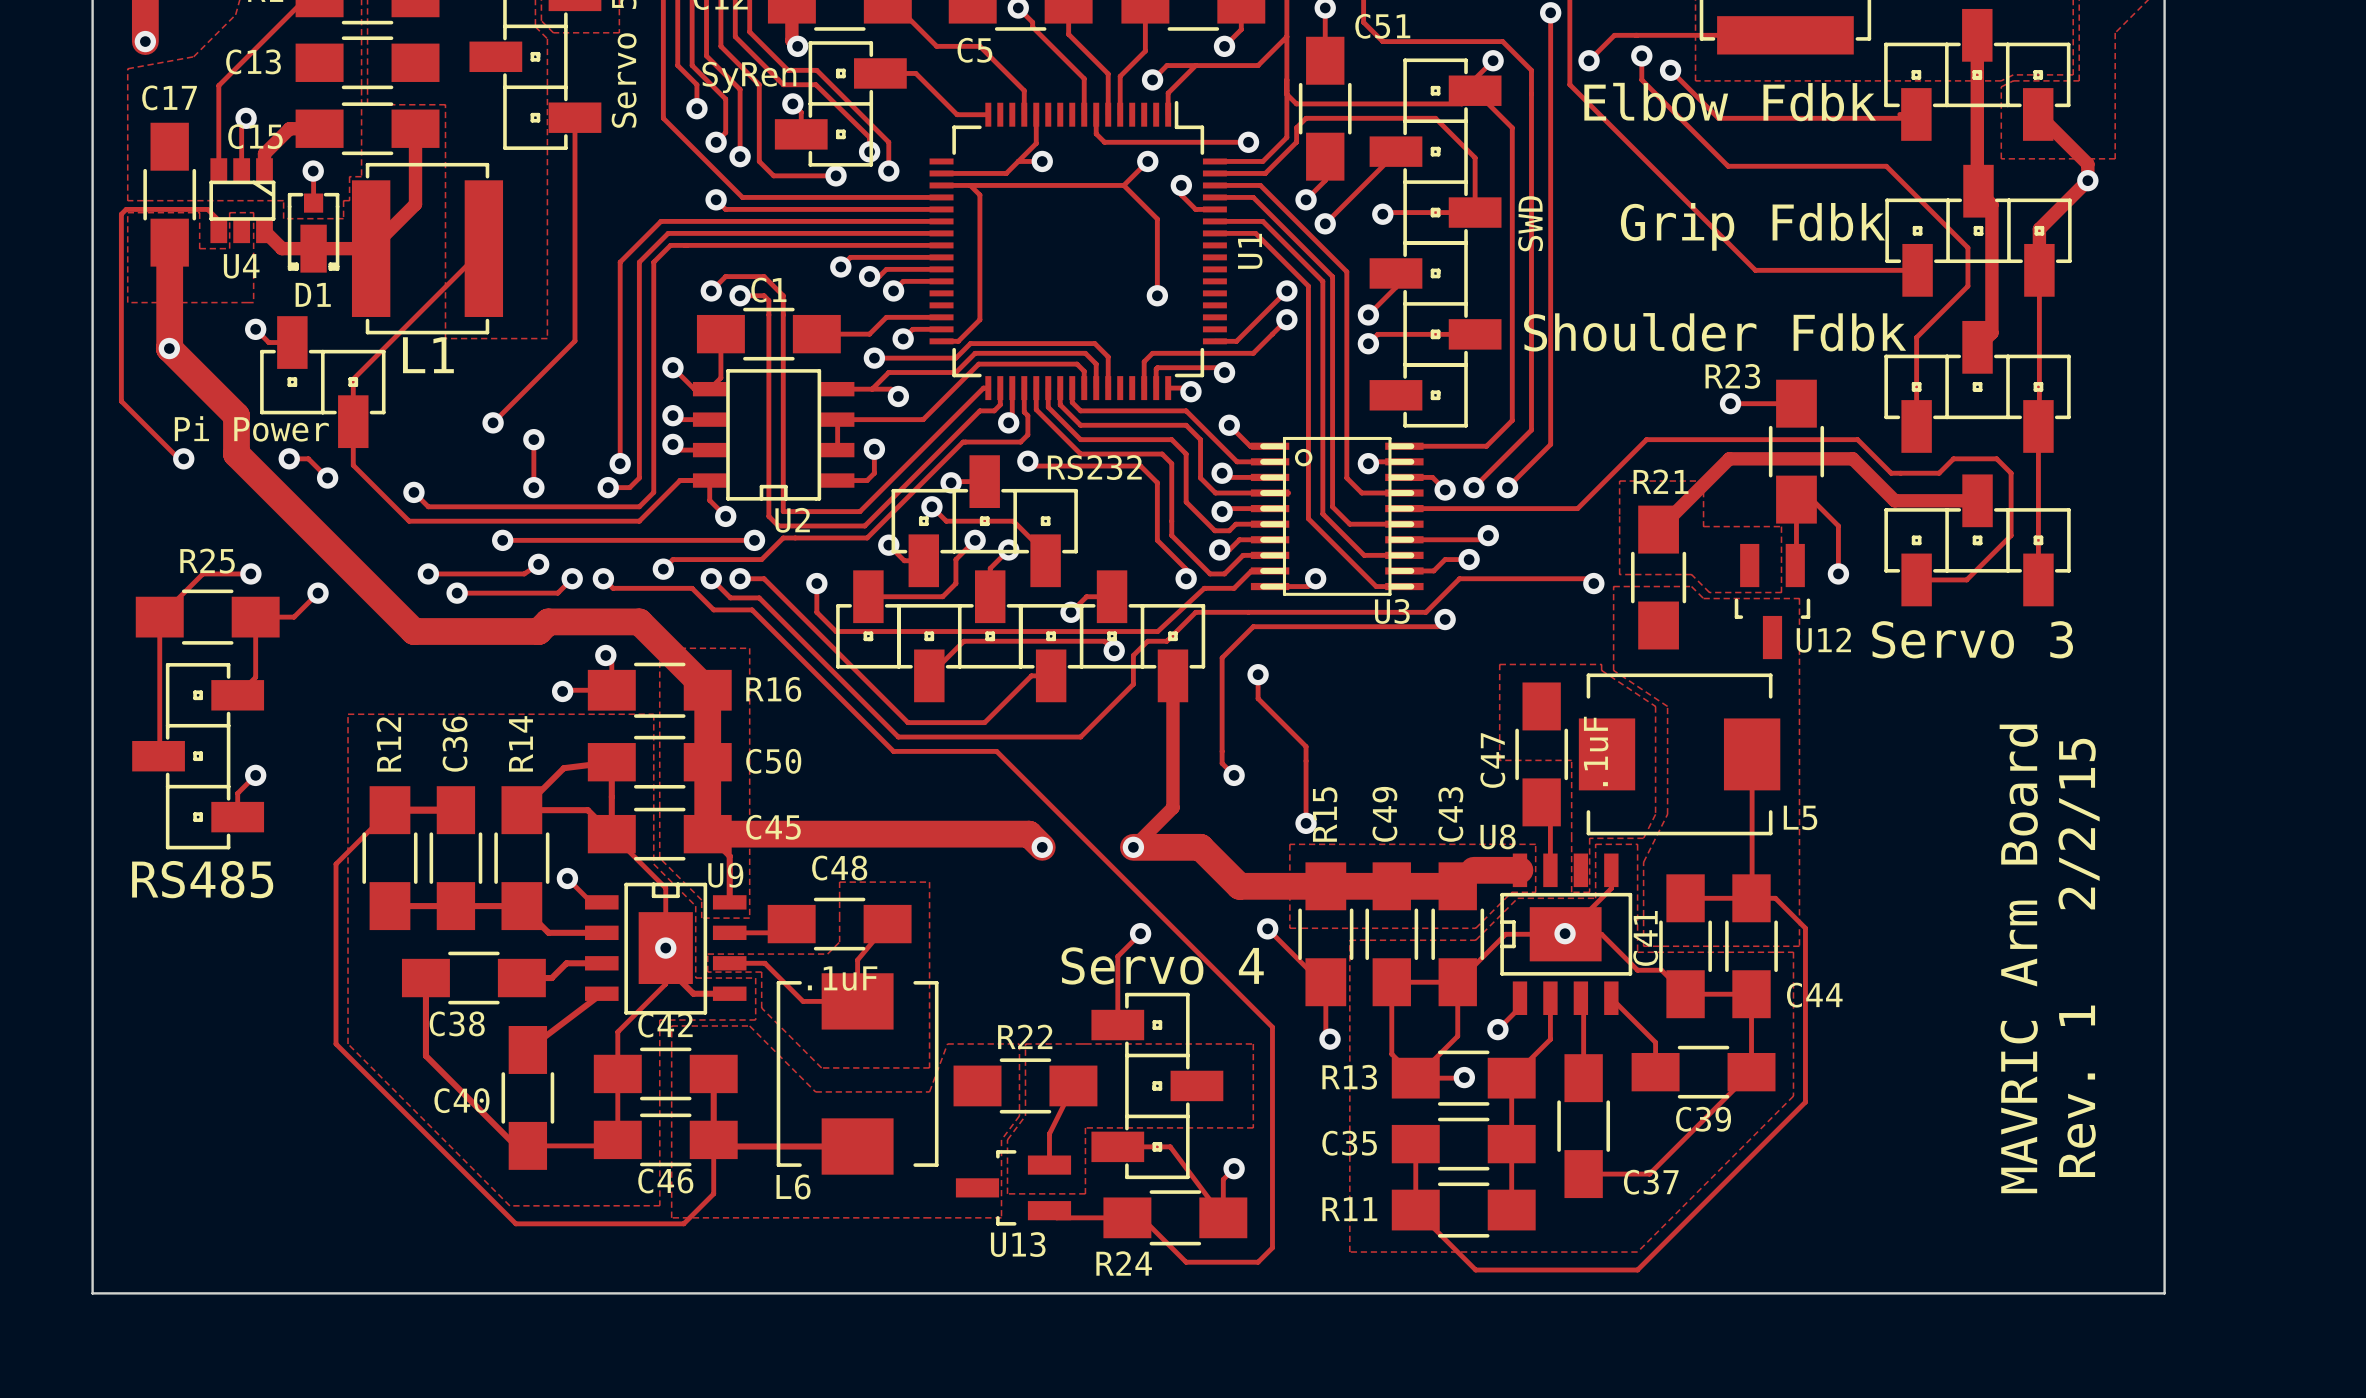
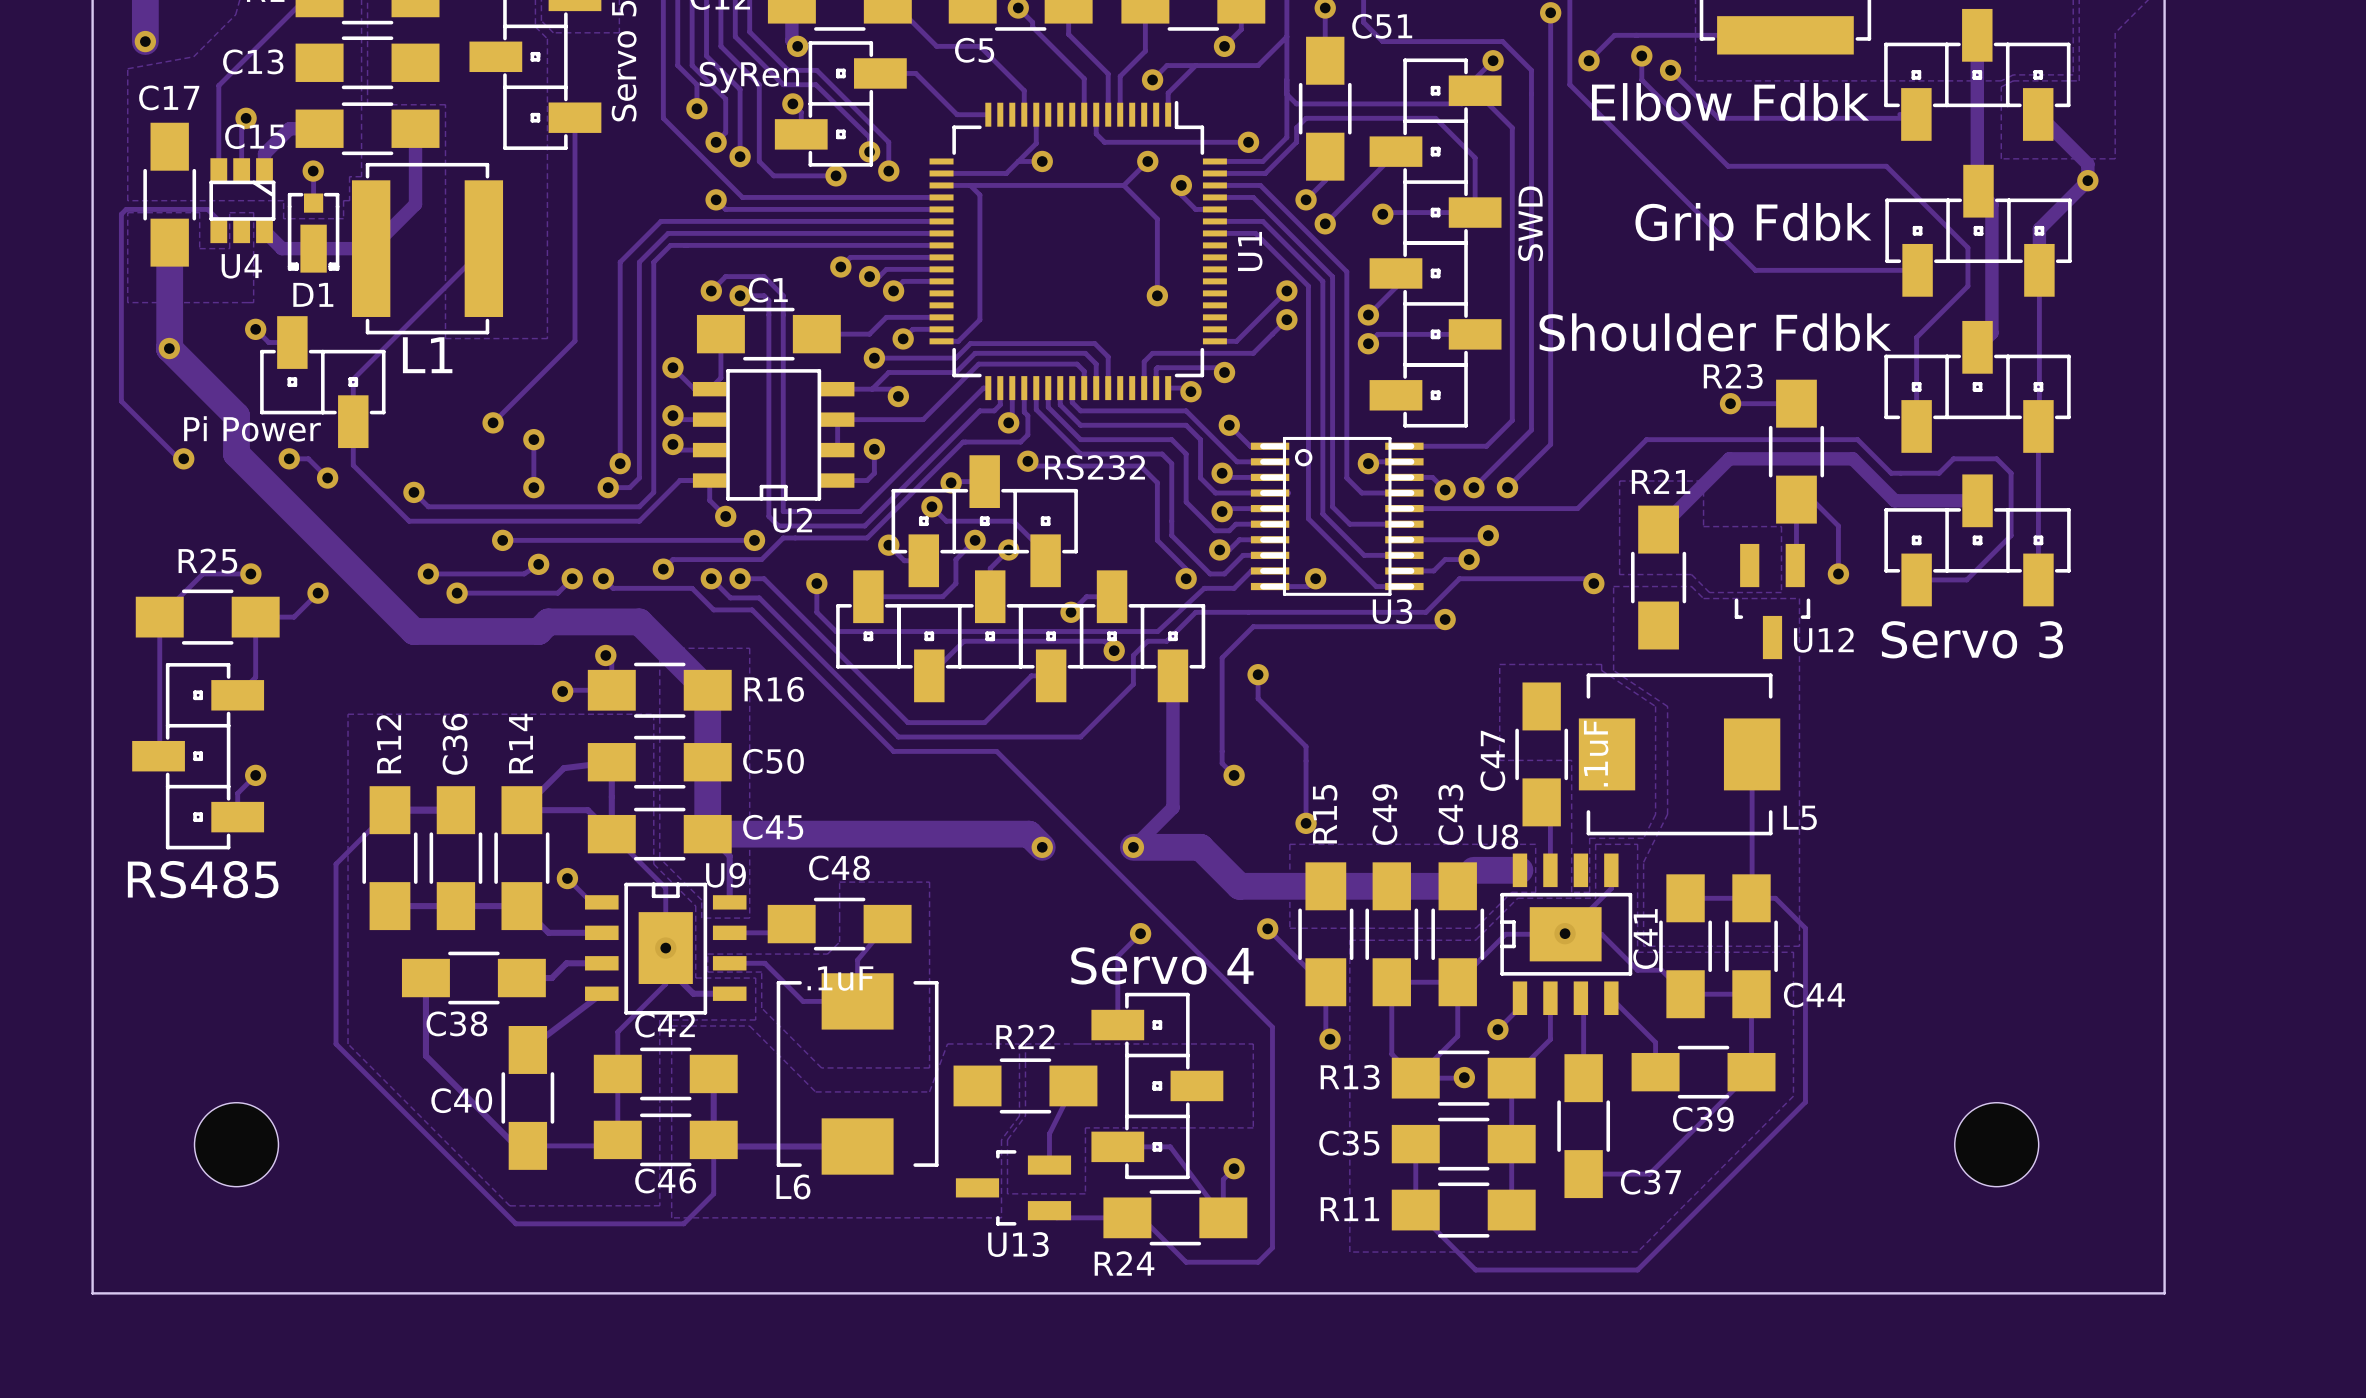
text: Rev. 1 2/2/15 (2079, 957) -> none
text: MAVRIC Arm Board (2018, 958) -> none
part: none -> (236, 1144)
part: none -> (1996, 1144)

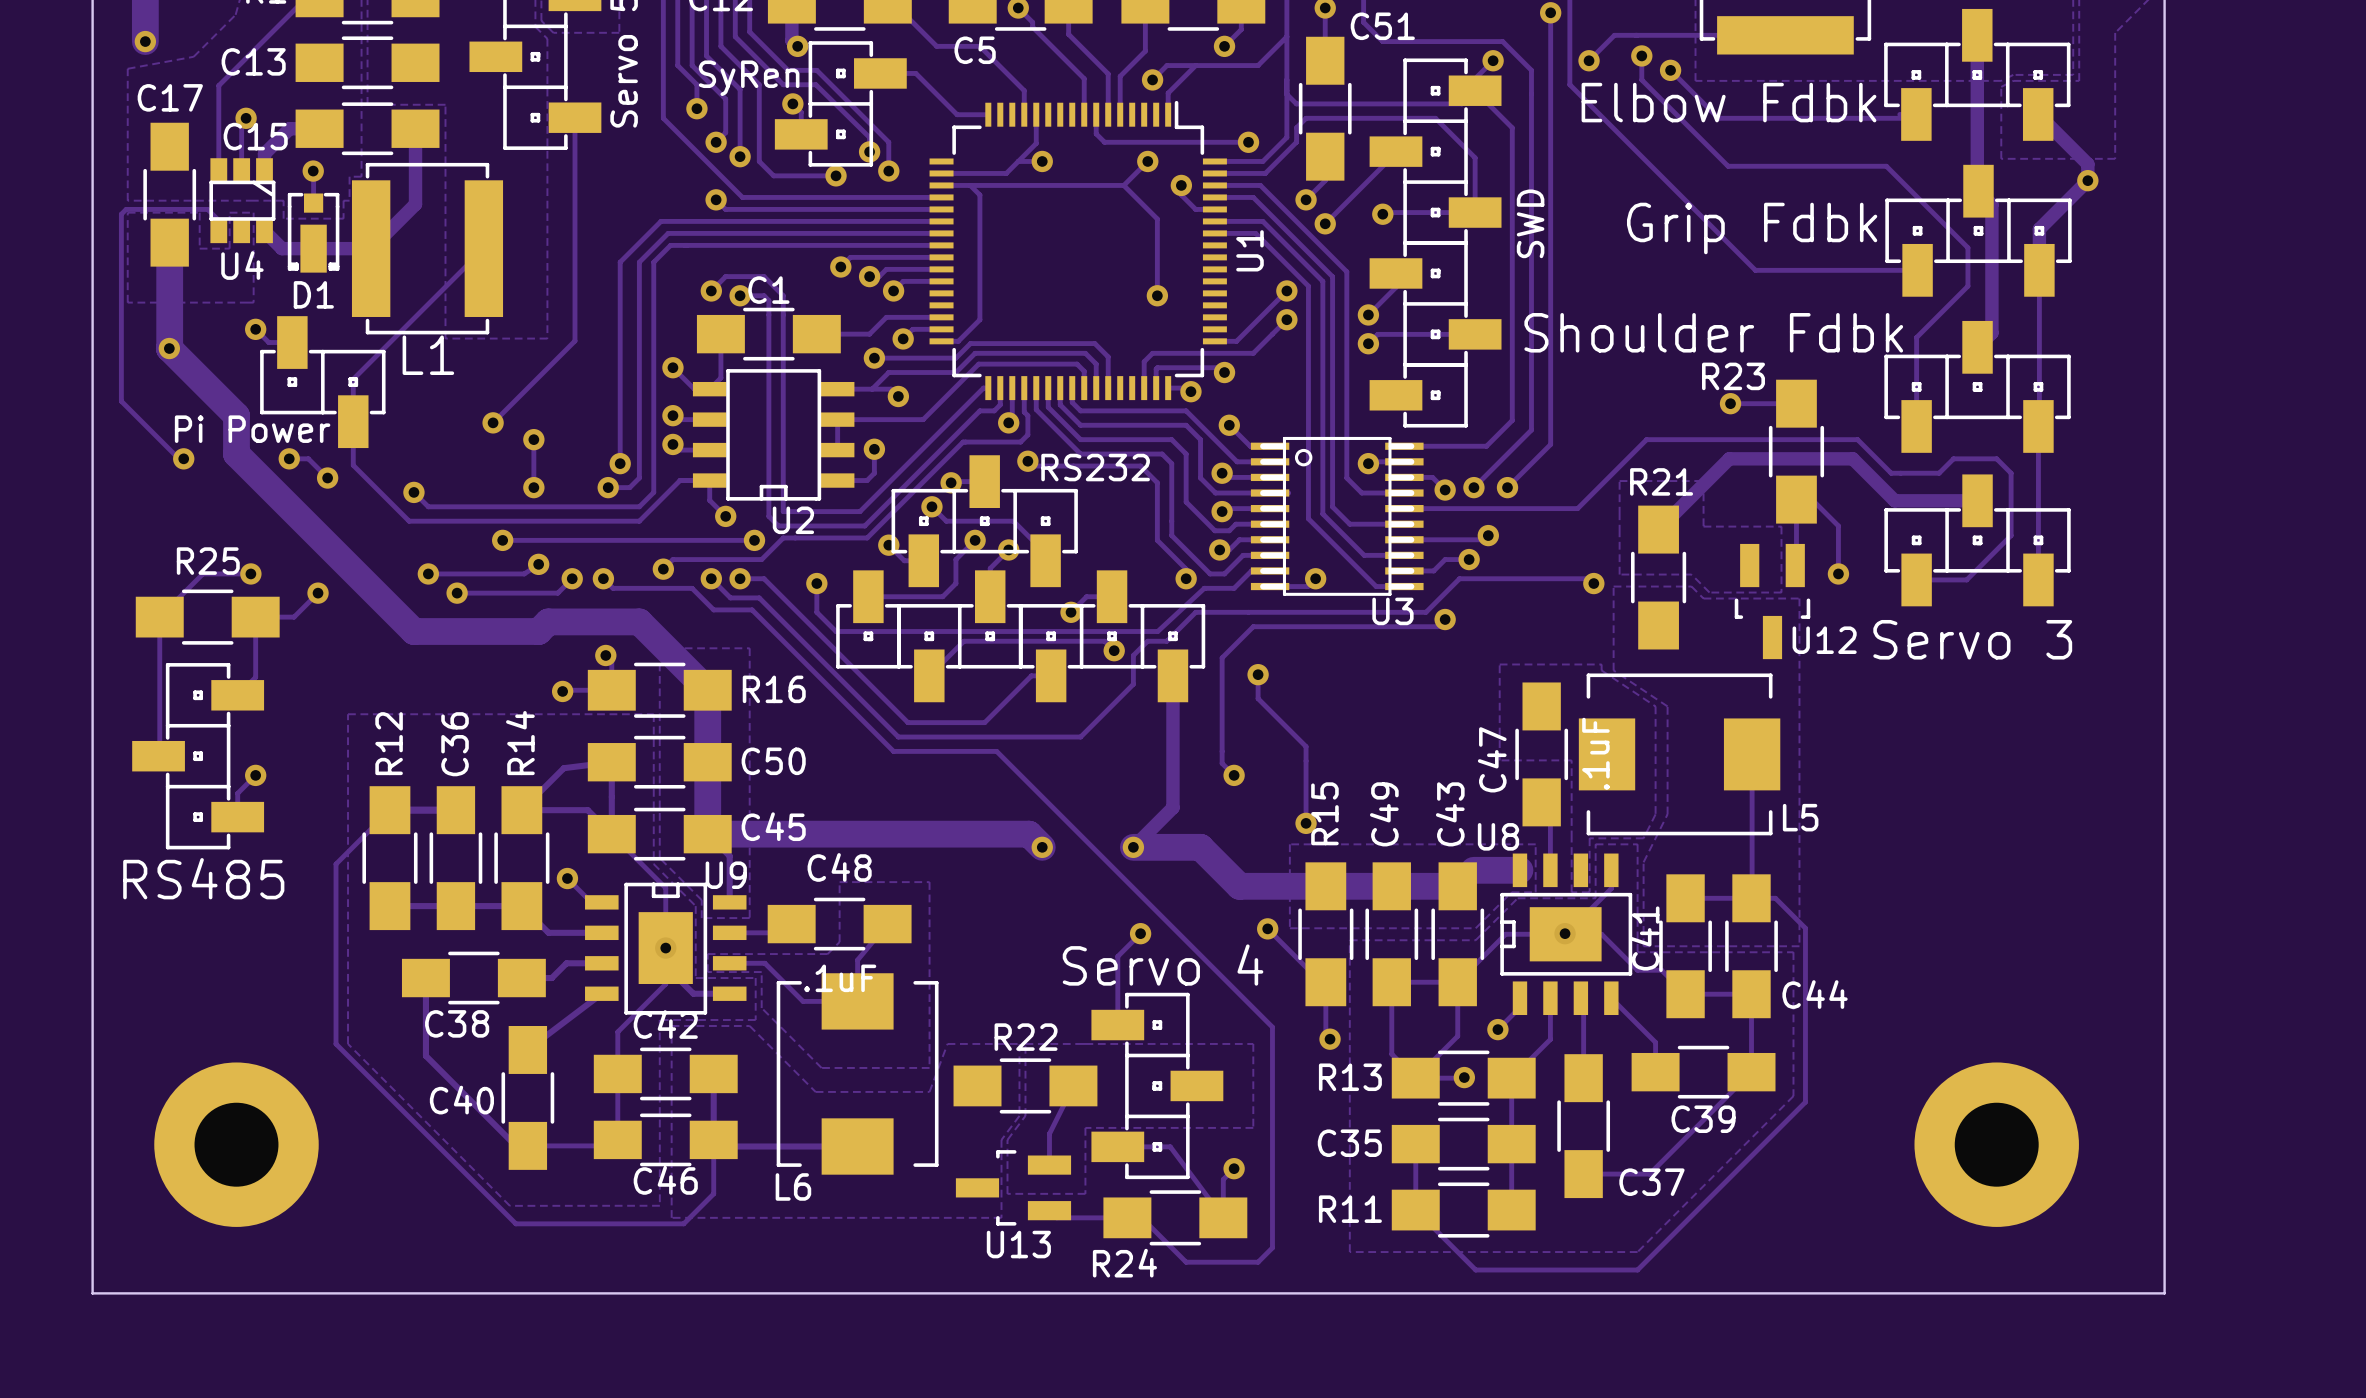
part footprint: [194, 1102, 279, 1187] -> [154, 1062, 319, 1227]
part footprint: [1954, 1102, 2039, 1187] -> [1914, 1062, 2079, 1227]

